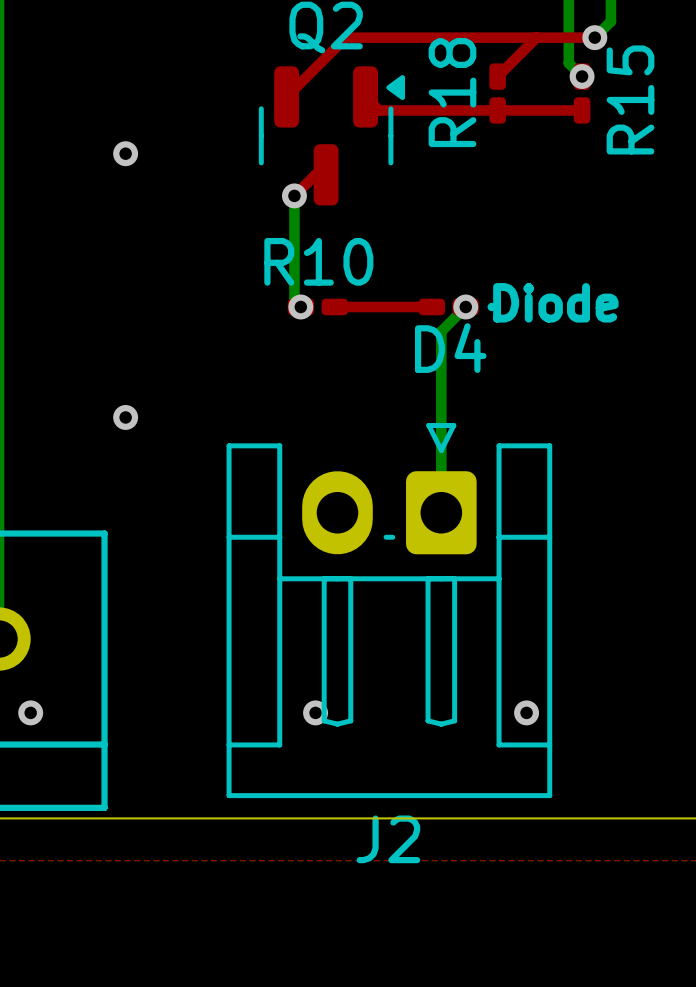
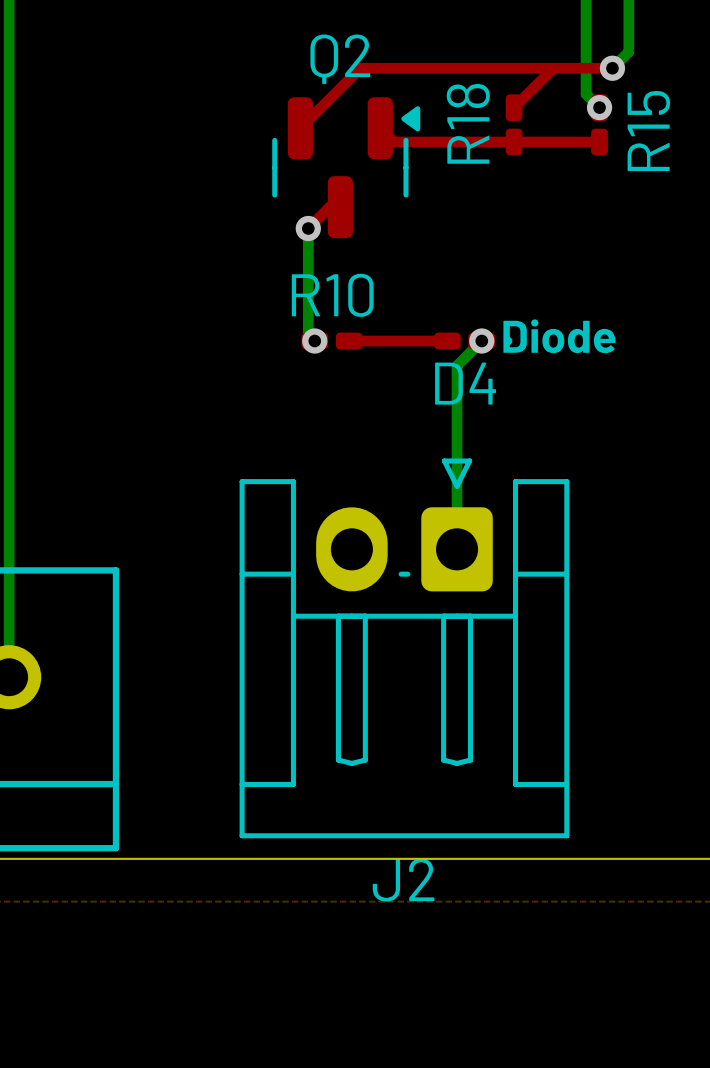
via: (125, 153) -> none
via: (125, 417) -> none
via: (30, 712) -> none
via: (315, 712) -> none
via: (526, 712) -> none

